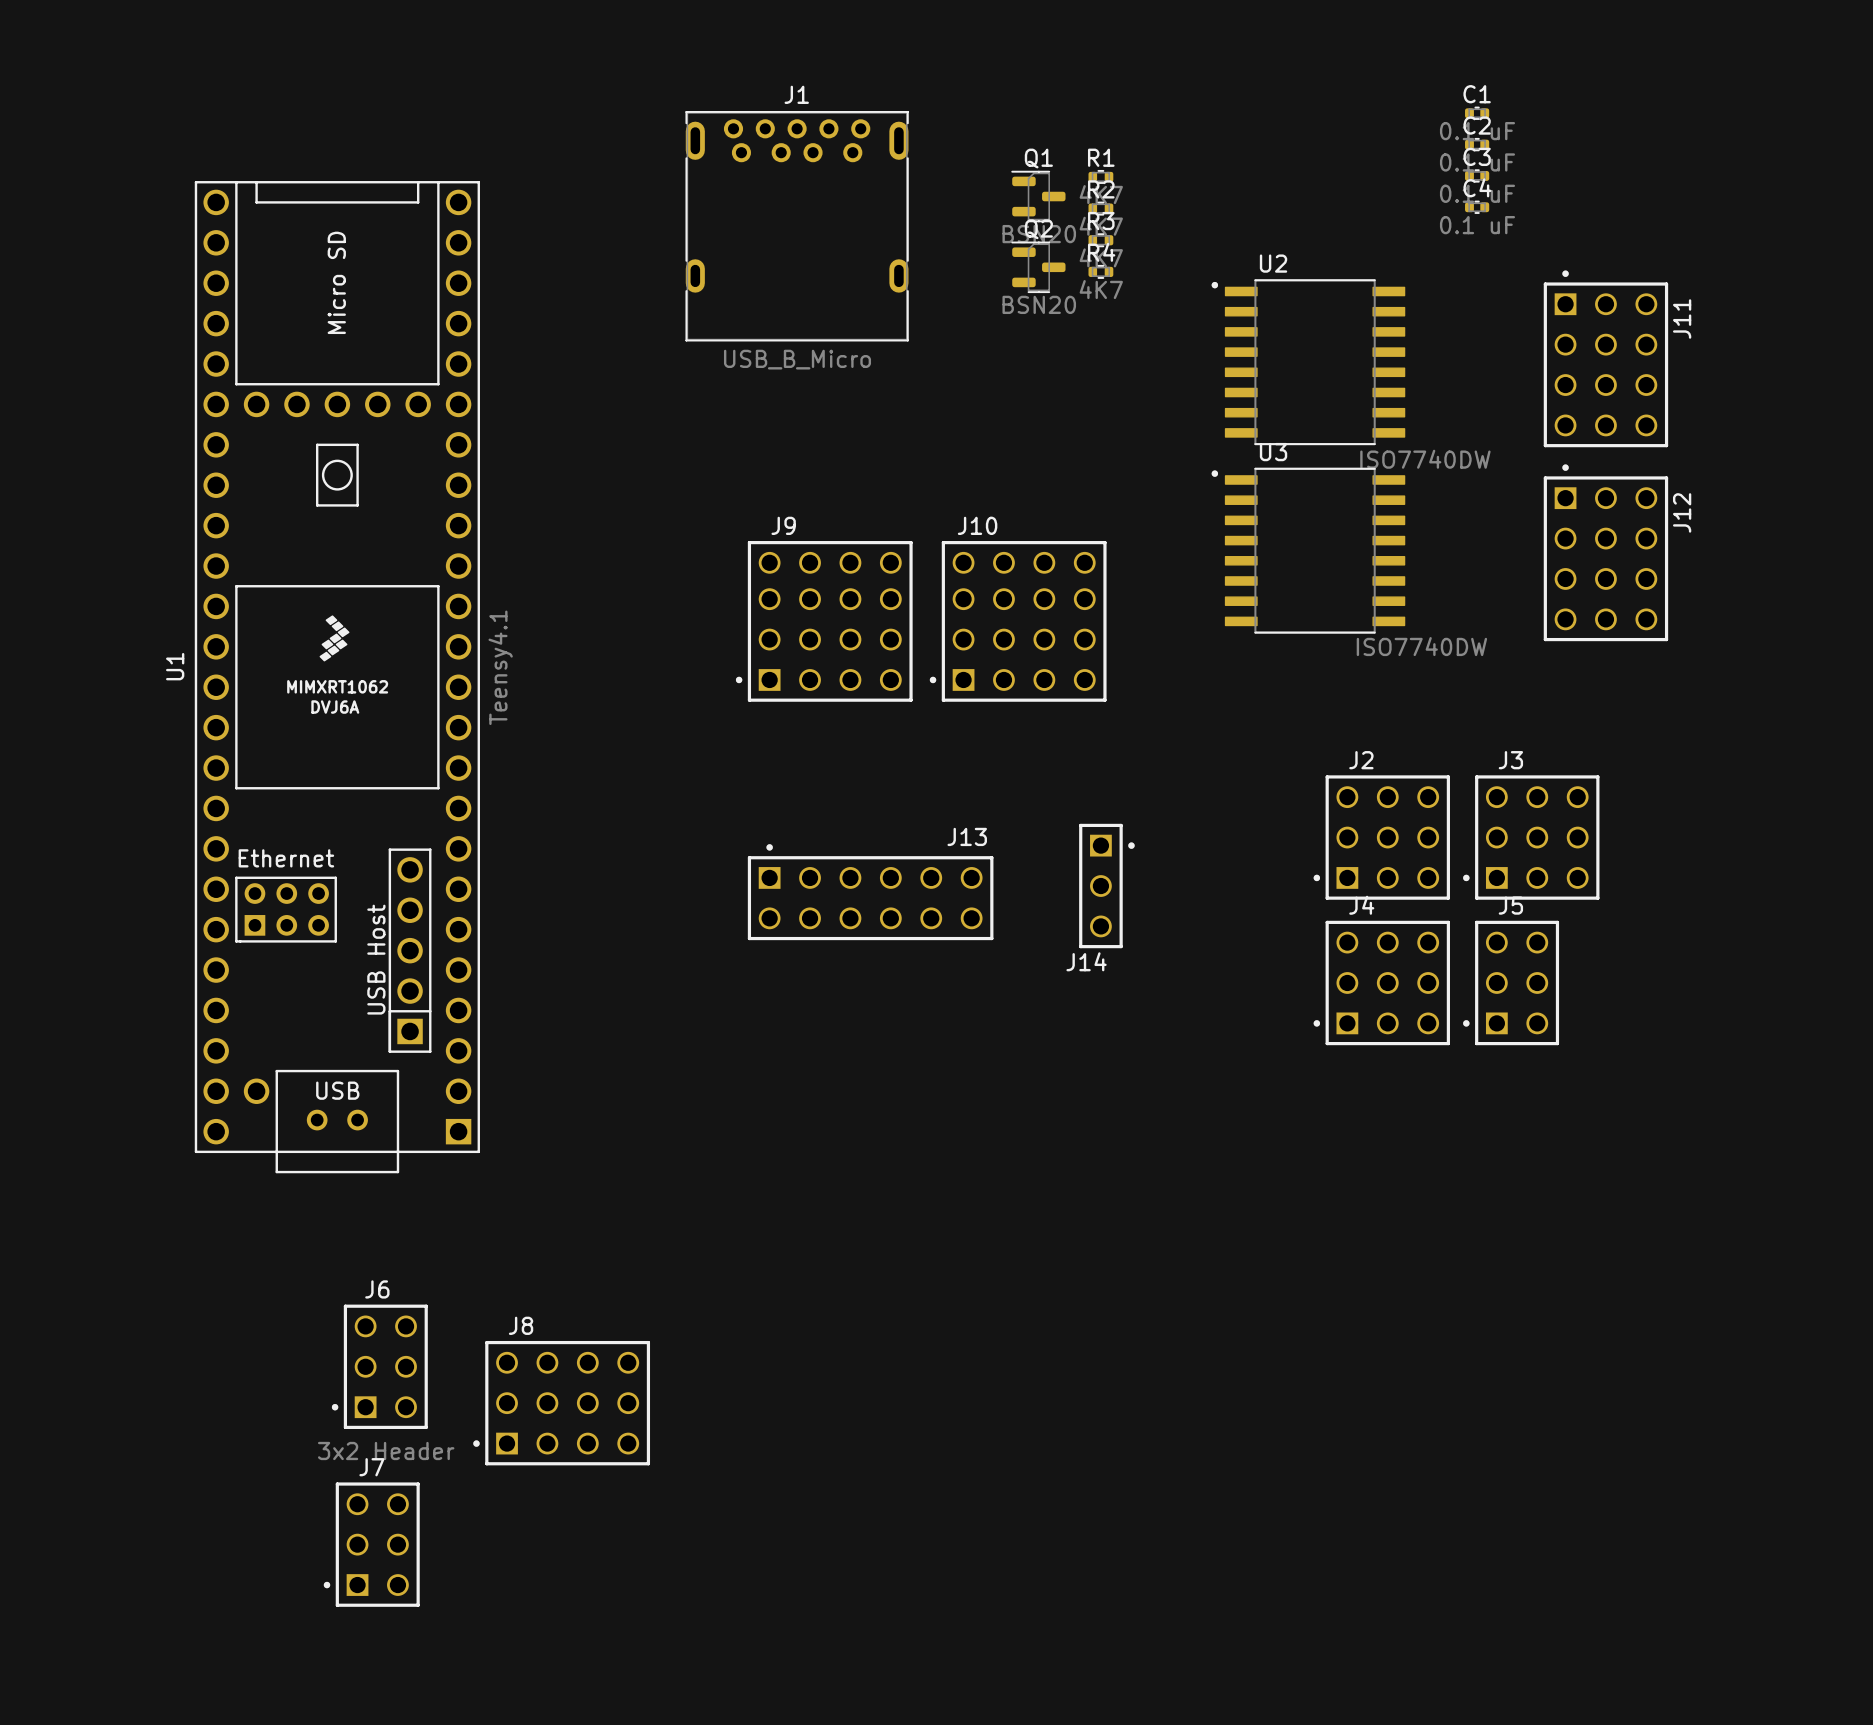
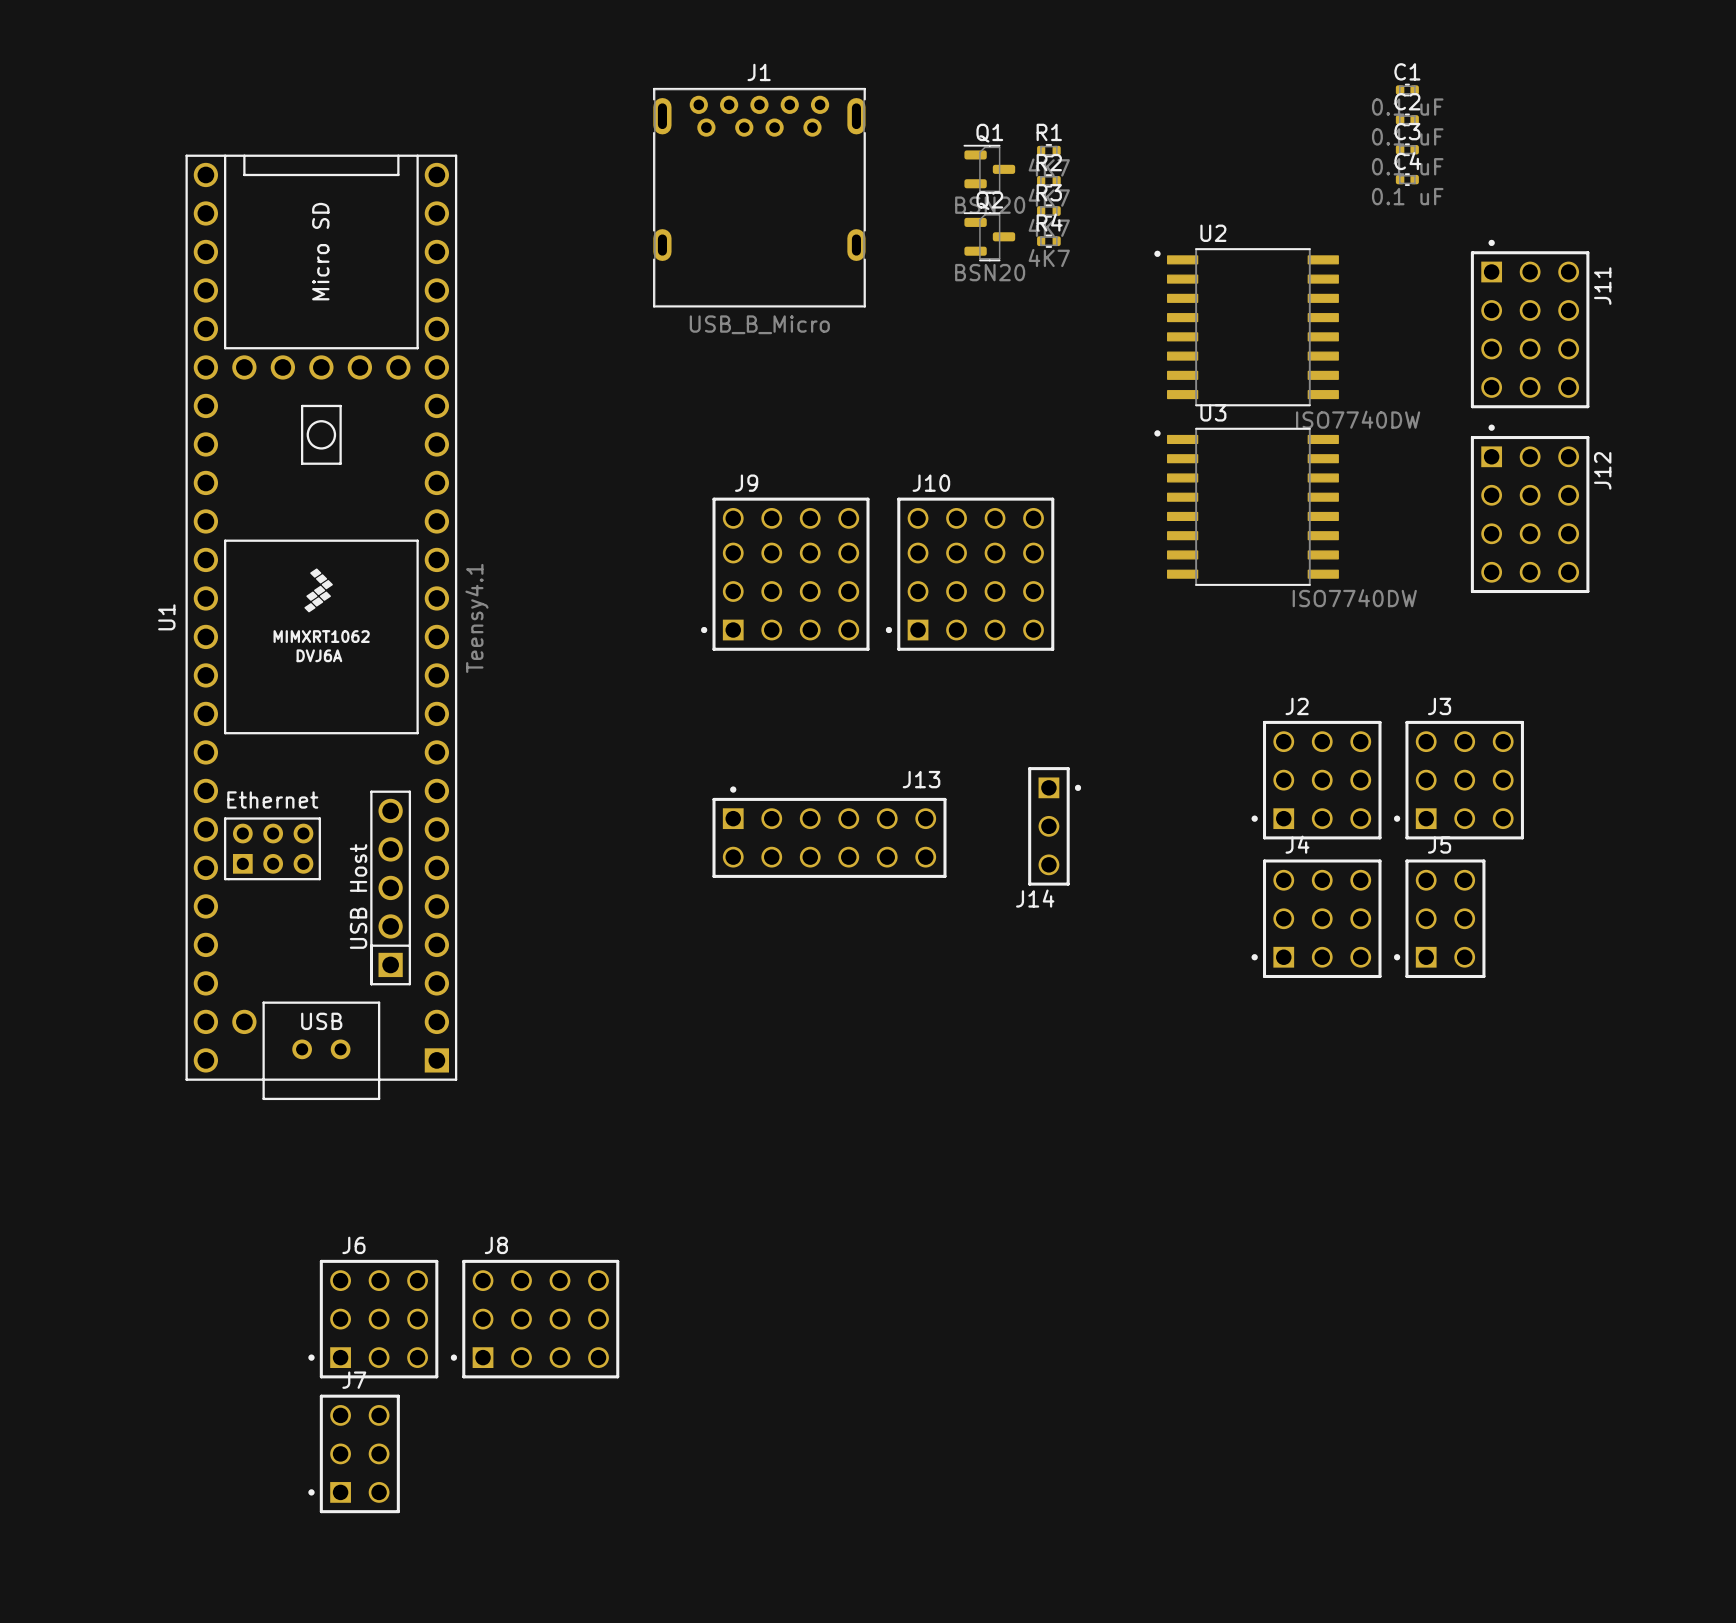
J6 footprint: [331, 1304, 428, 1429] -> [308, 1259, 439, 1379]
J6 value: 3x2 Header (386, 1450) -> none

